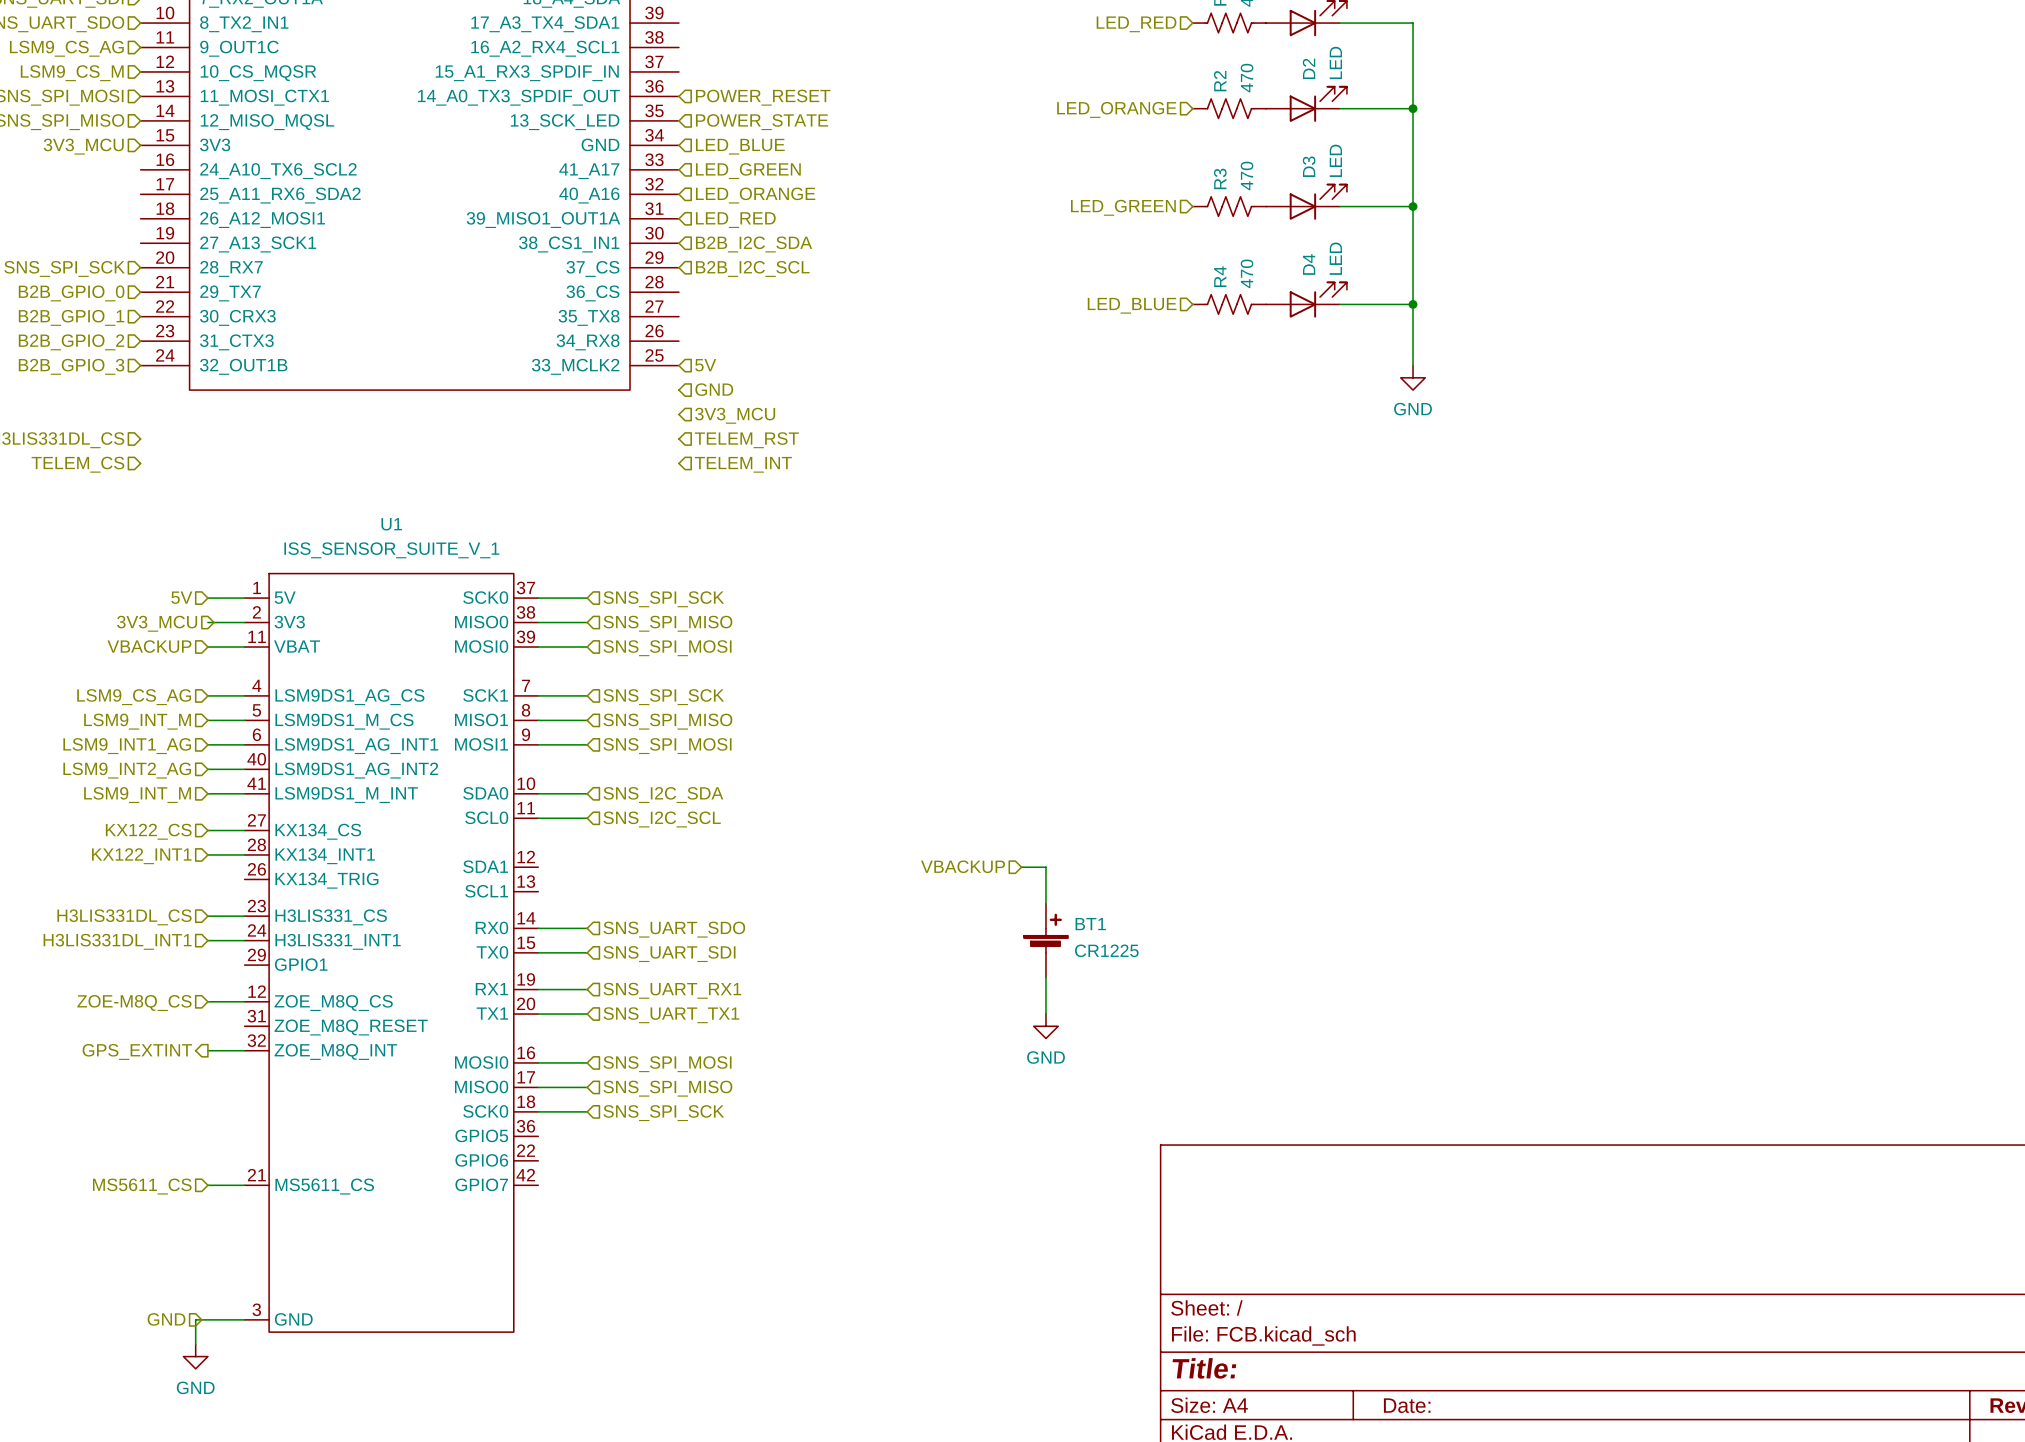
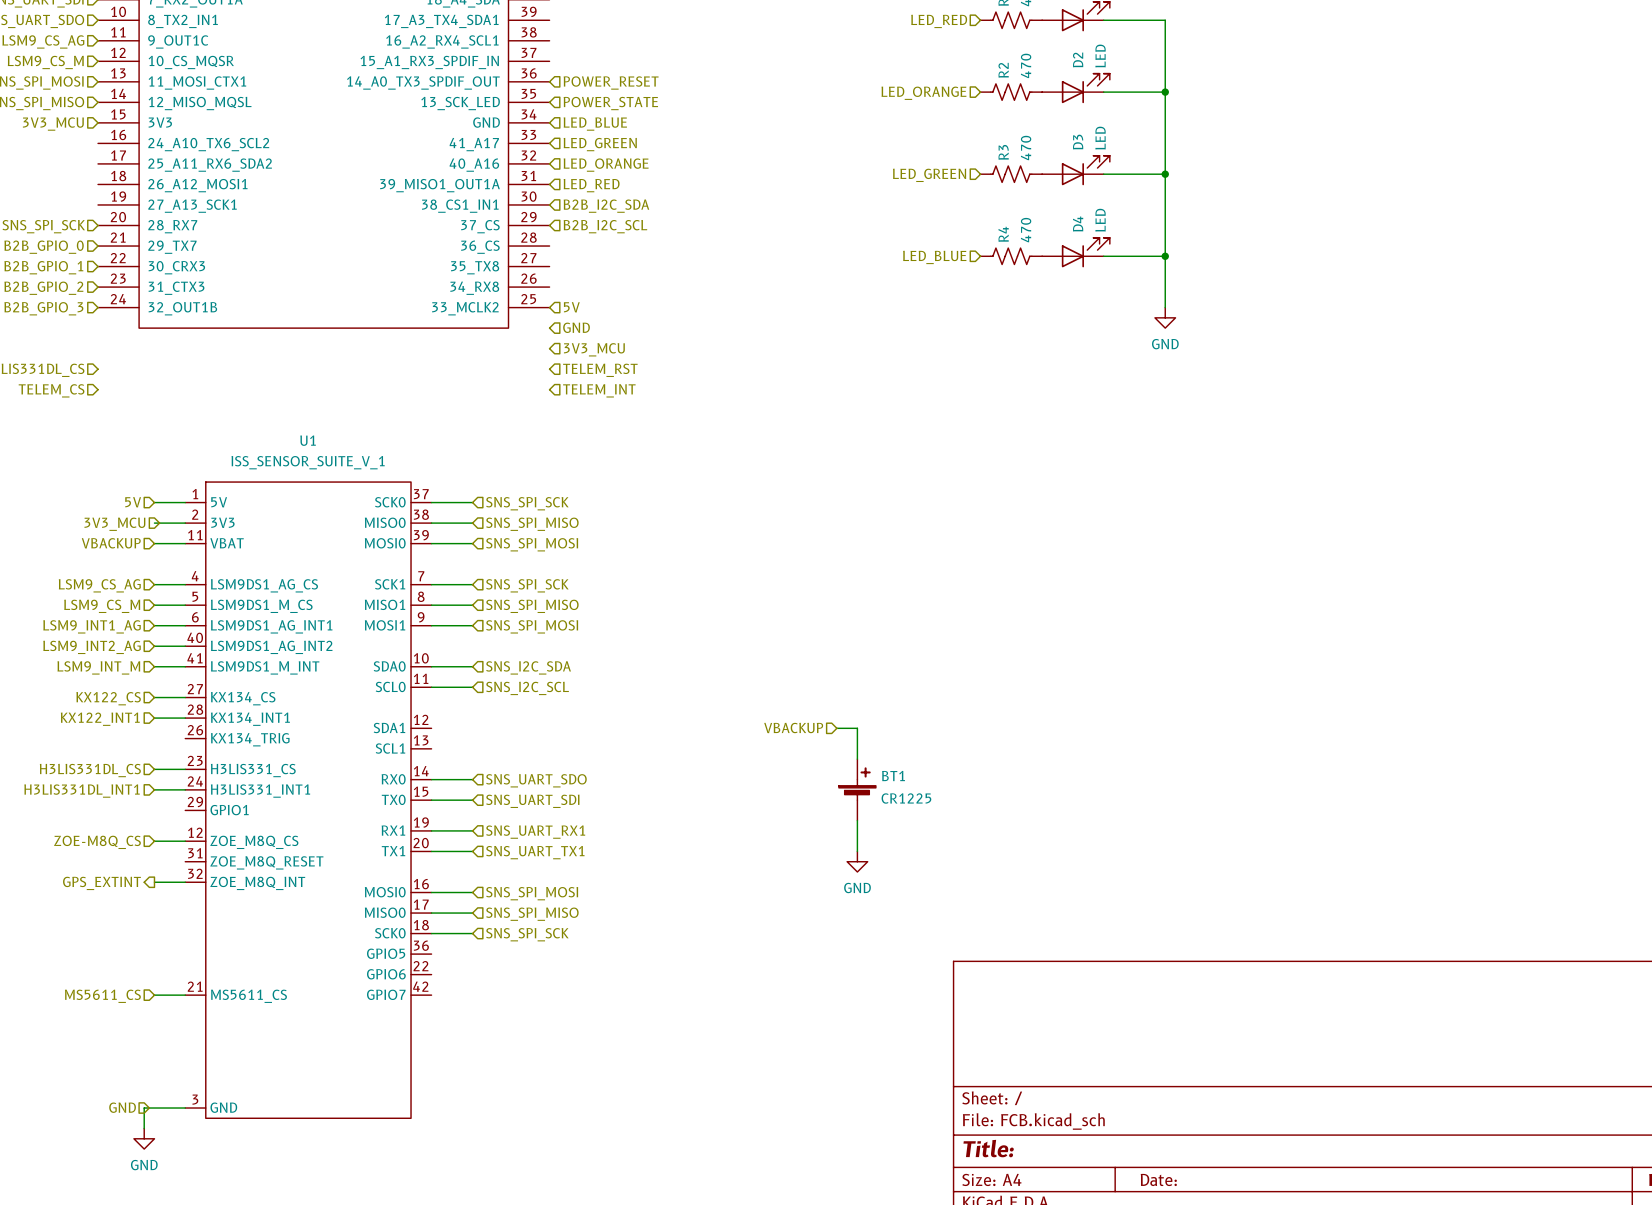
hierarchical label: LSM9_INT_M (137, 721) -> LSM9_CS_M (102, 606)

